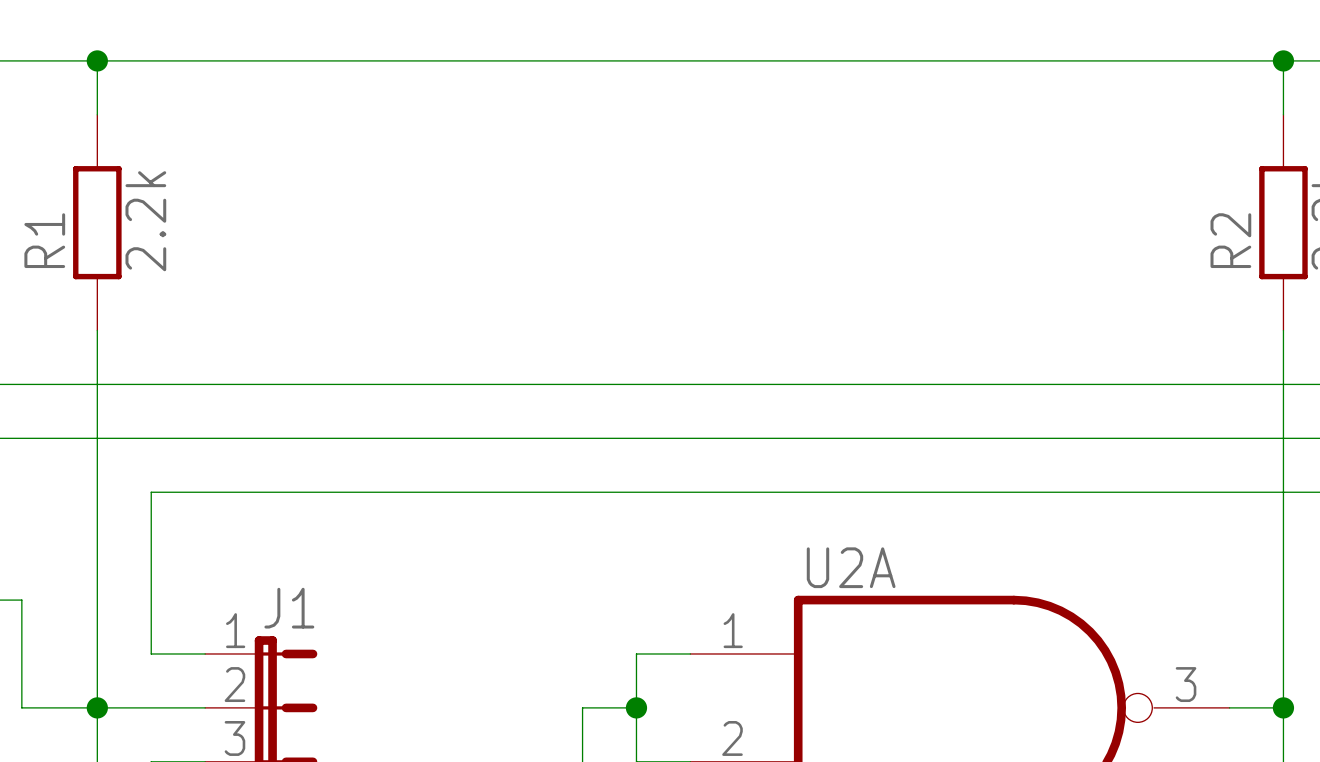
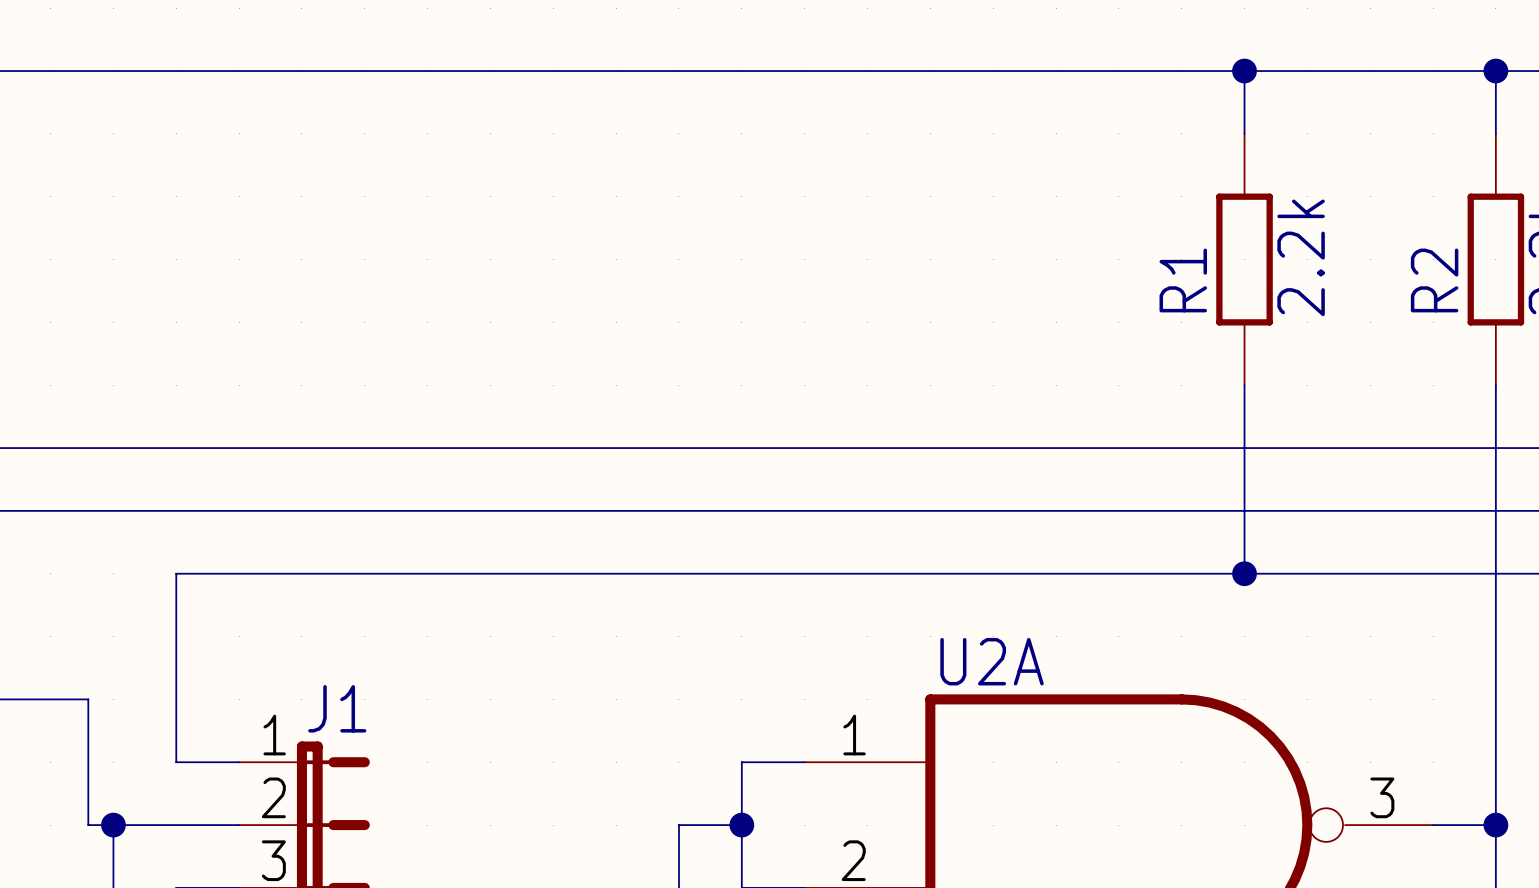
wire: (97, 60) (97, 114) -> none
junction: (97, 60) -> none
wire: none -> (1244, 71) (1244, 133)
junction: none -> (1244, 71)
R1 position: (97, 222) -> (1244, 259)
wire: (97, 330) (97, 707) -> none
wire: none -> (1244, 385) (1244, 573)
junction: none -> (1244, 573)
wire: (21, 600) (21, 707) (75, 707) -> (25, 699) (88, 699) (88, 825)

